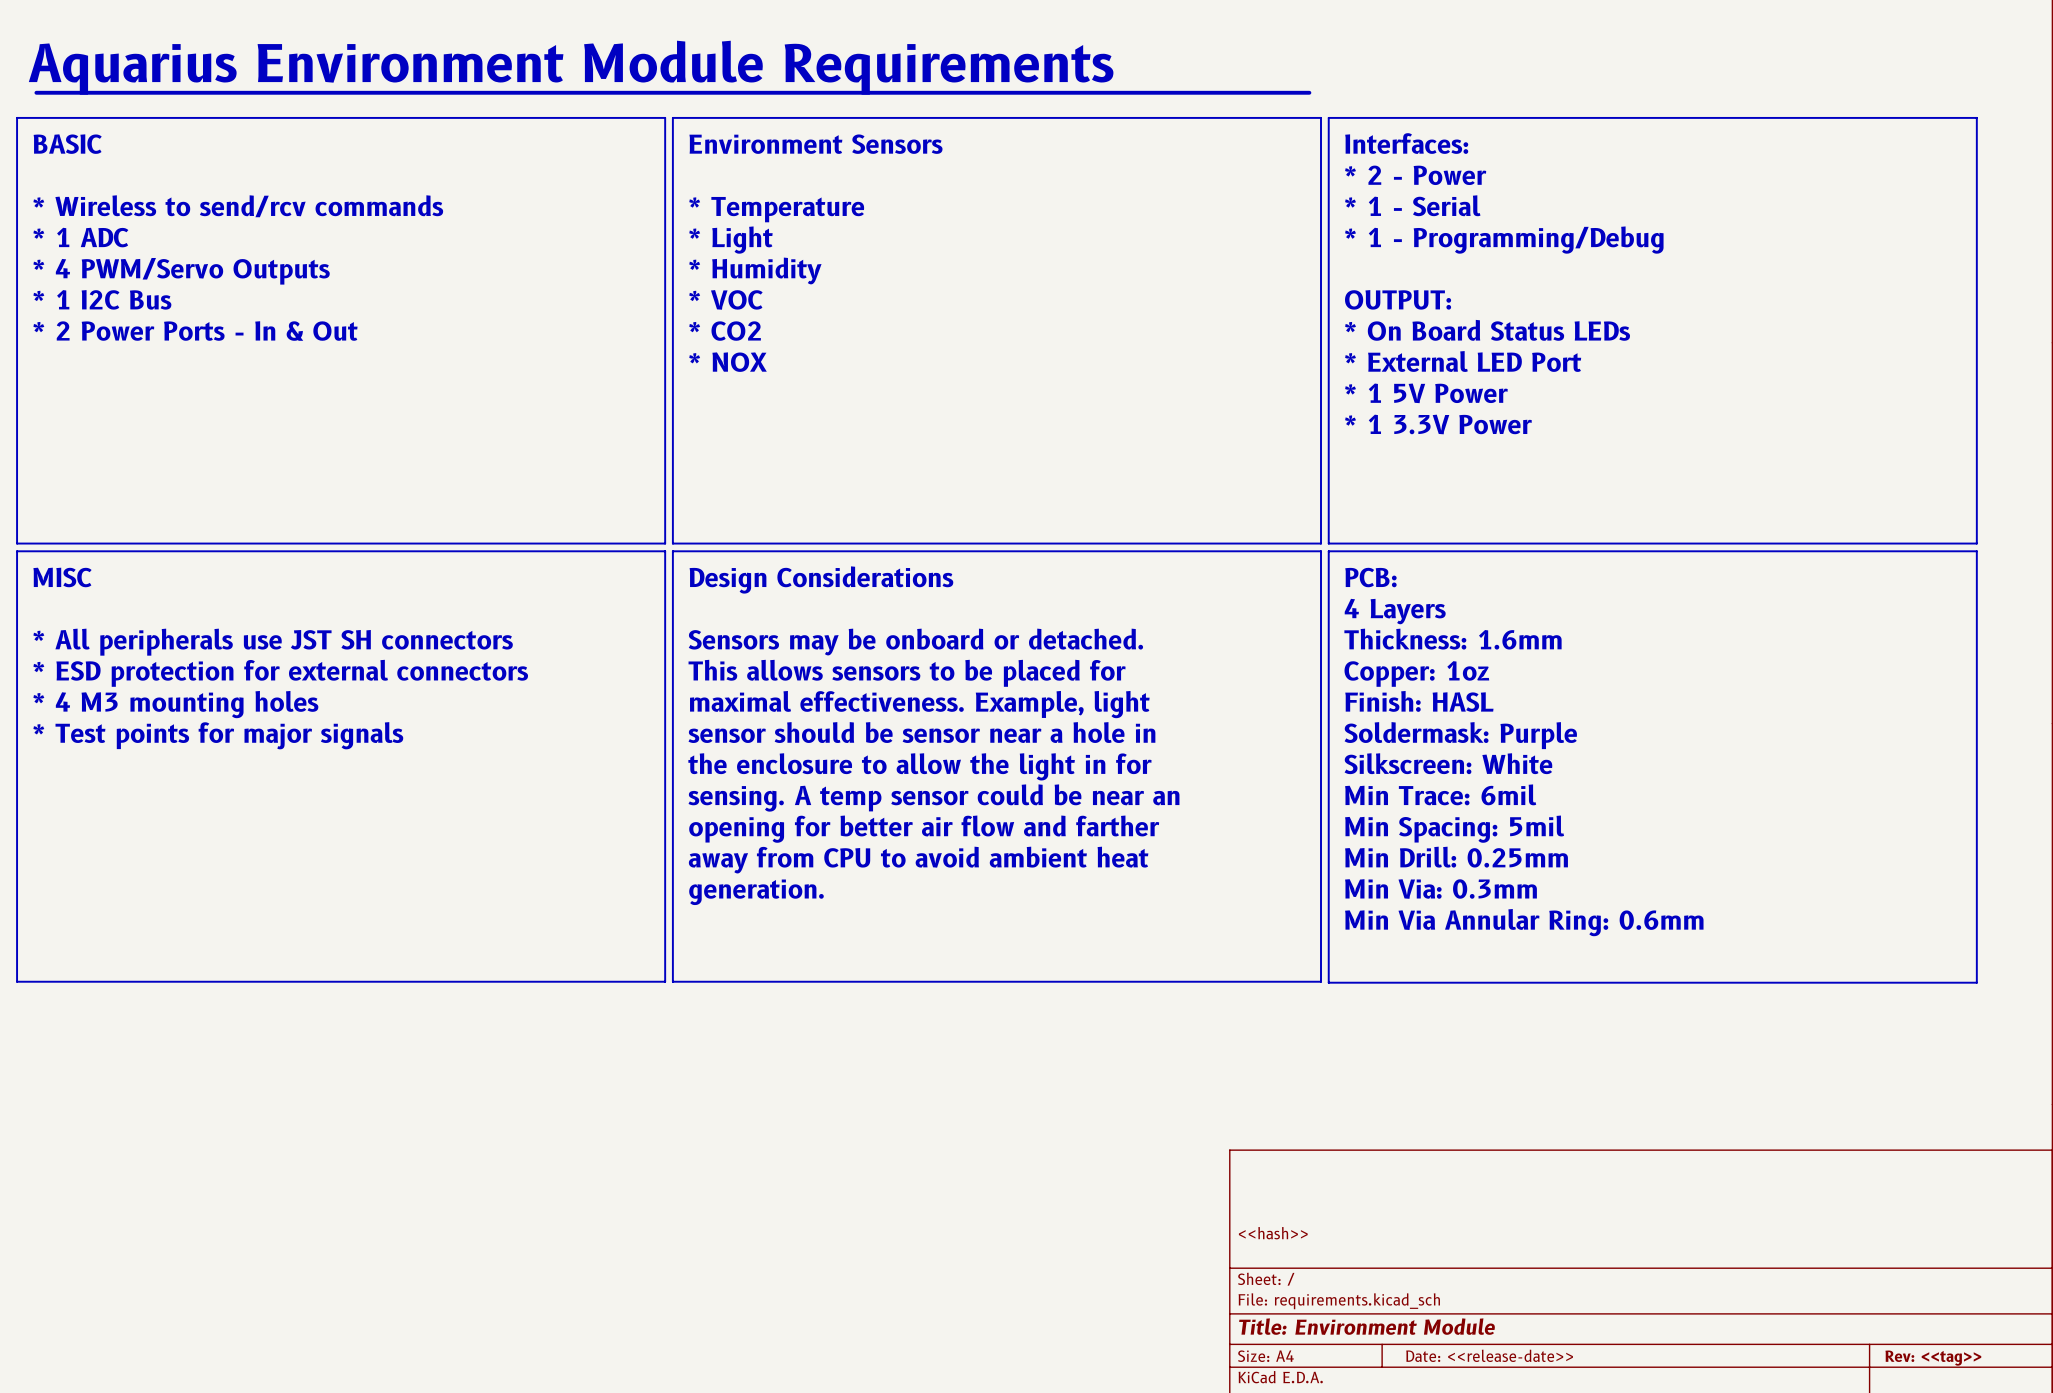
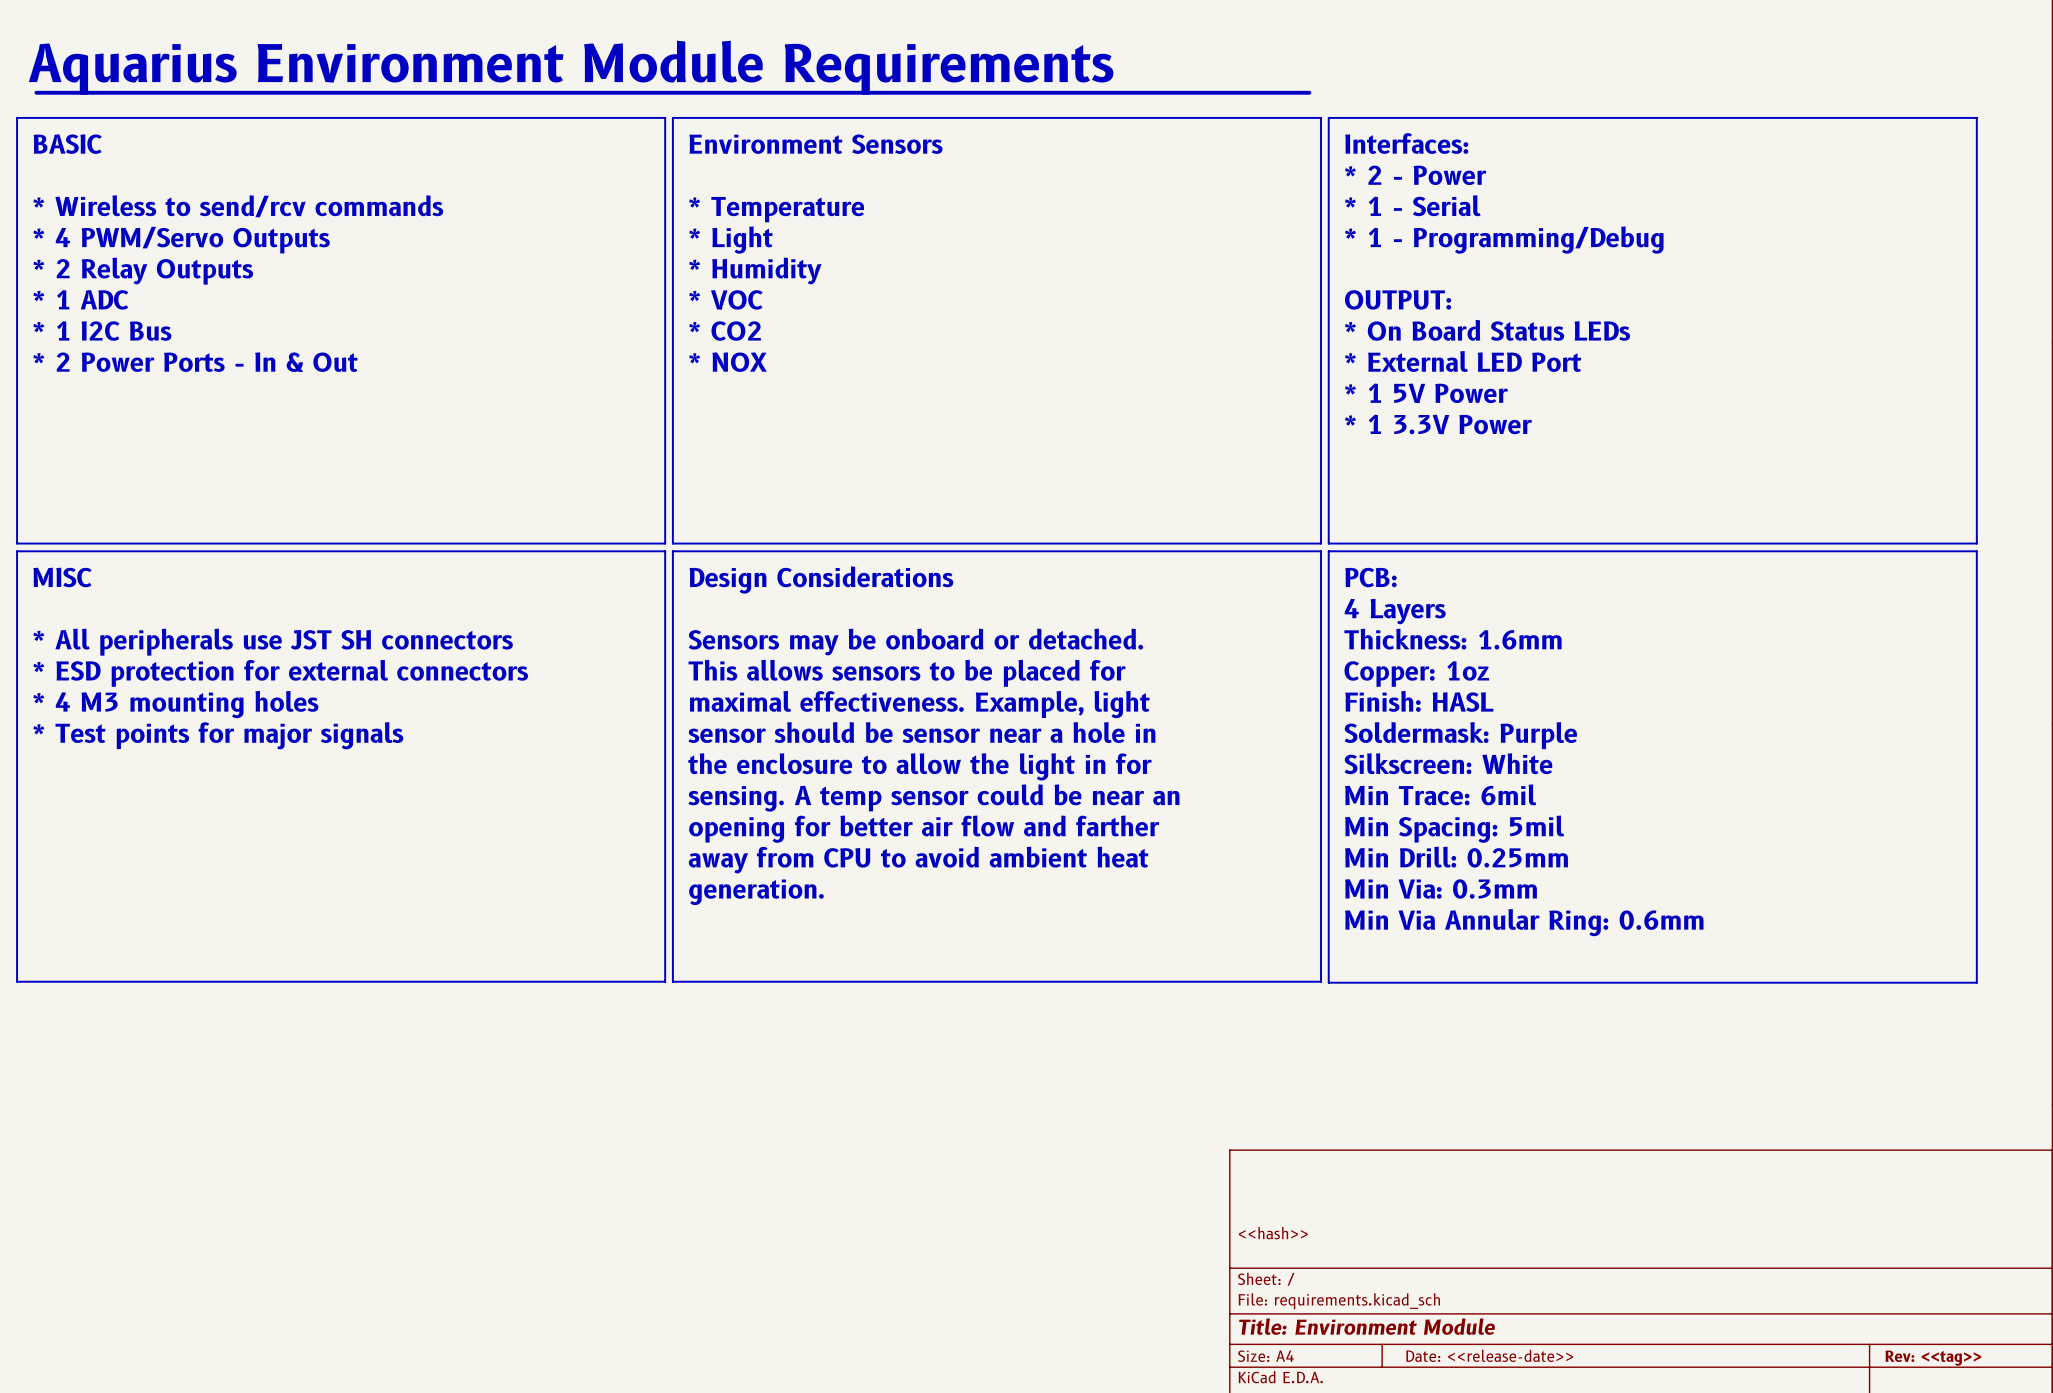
text: * 1 ADC (80, 237) -> * 4 PWM/Servo Outputs (181, 240)
text: * 4 PWM/Servo Outputs (181, 271) -> * 2 Relay Outputs (143, 271)
text: * 1 I2C Bus (102, 299) -> * 1 ADC (80, 299)
text: * 2 Power Ports - In & Out (195, 331) -> * 1 I2C Bus (102, 331)
text: none -> * 2 Power Ports - In & Out (195, 362)

